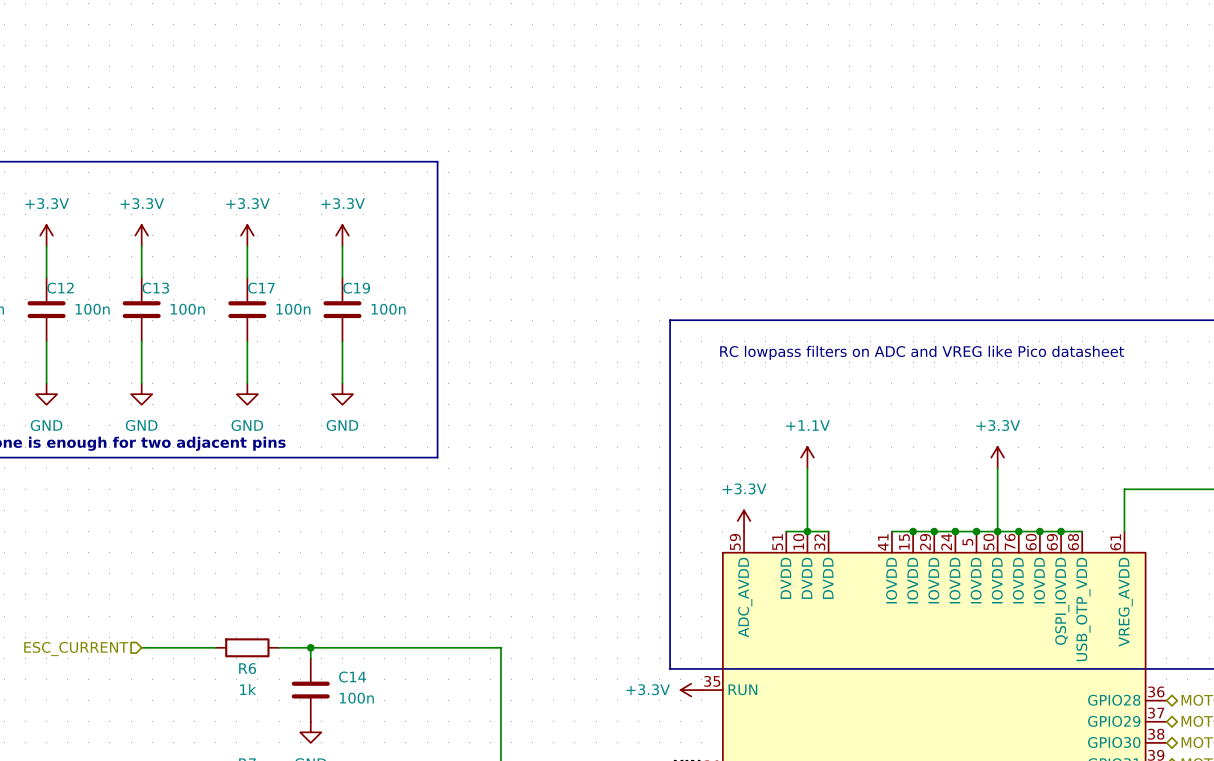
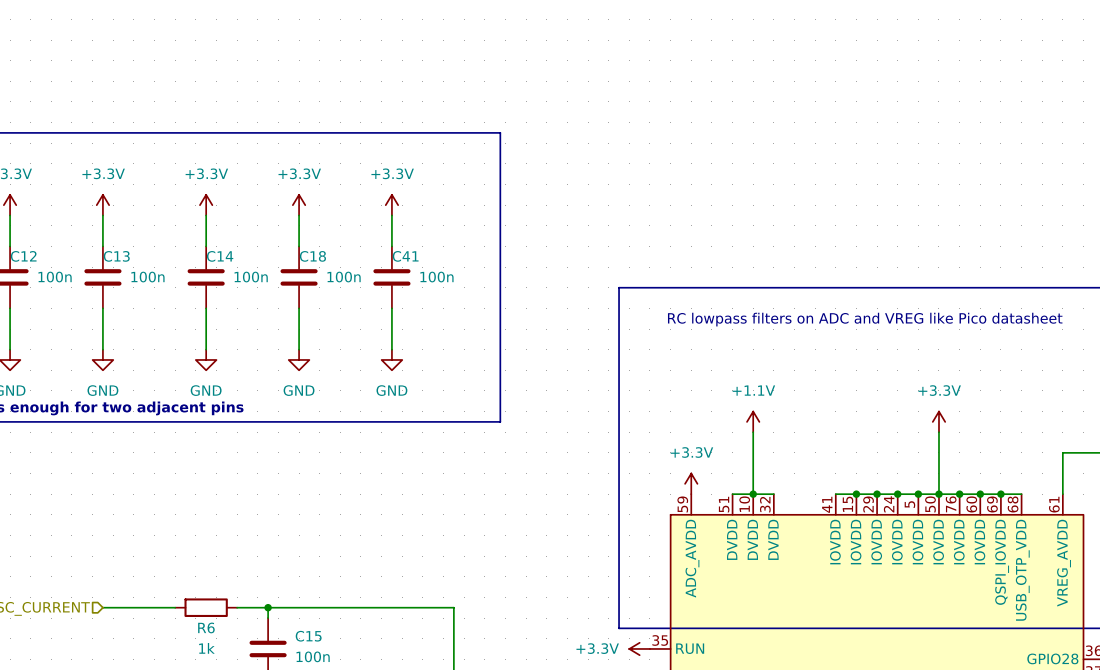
line: (437, 161) (437, 457) -> (391, 132) (500, 132) (500, 421) (391, 421)
power symbol: none -> +3.3V (391, 205)
C17 name: C17 (261, 288) -> C14 (220, 256)
C19 name: C19 (356, 288) -> C18 (312, 256)
C41: none -> 100n (391, 277)
power symbol: none -> GND (391, 359)
C14 name: C14 (352, 677) -> C15 (308, 636)

